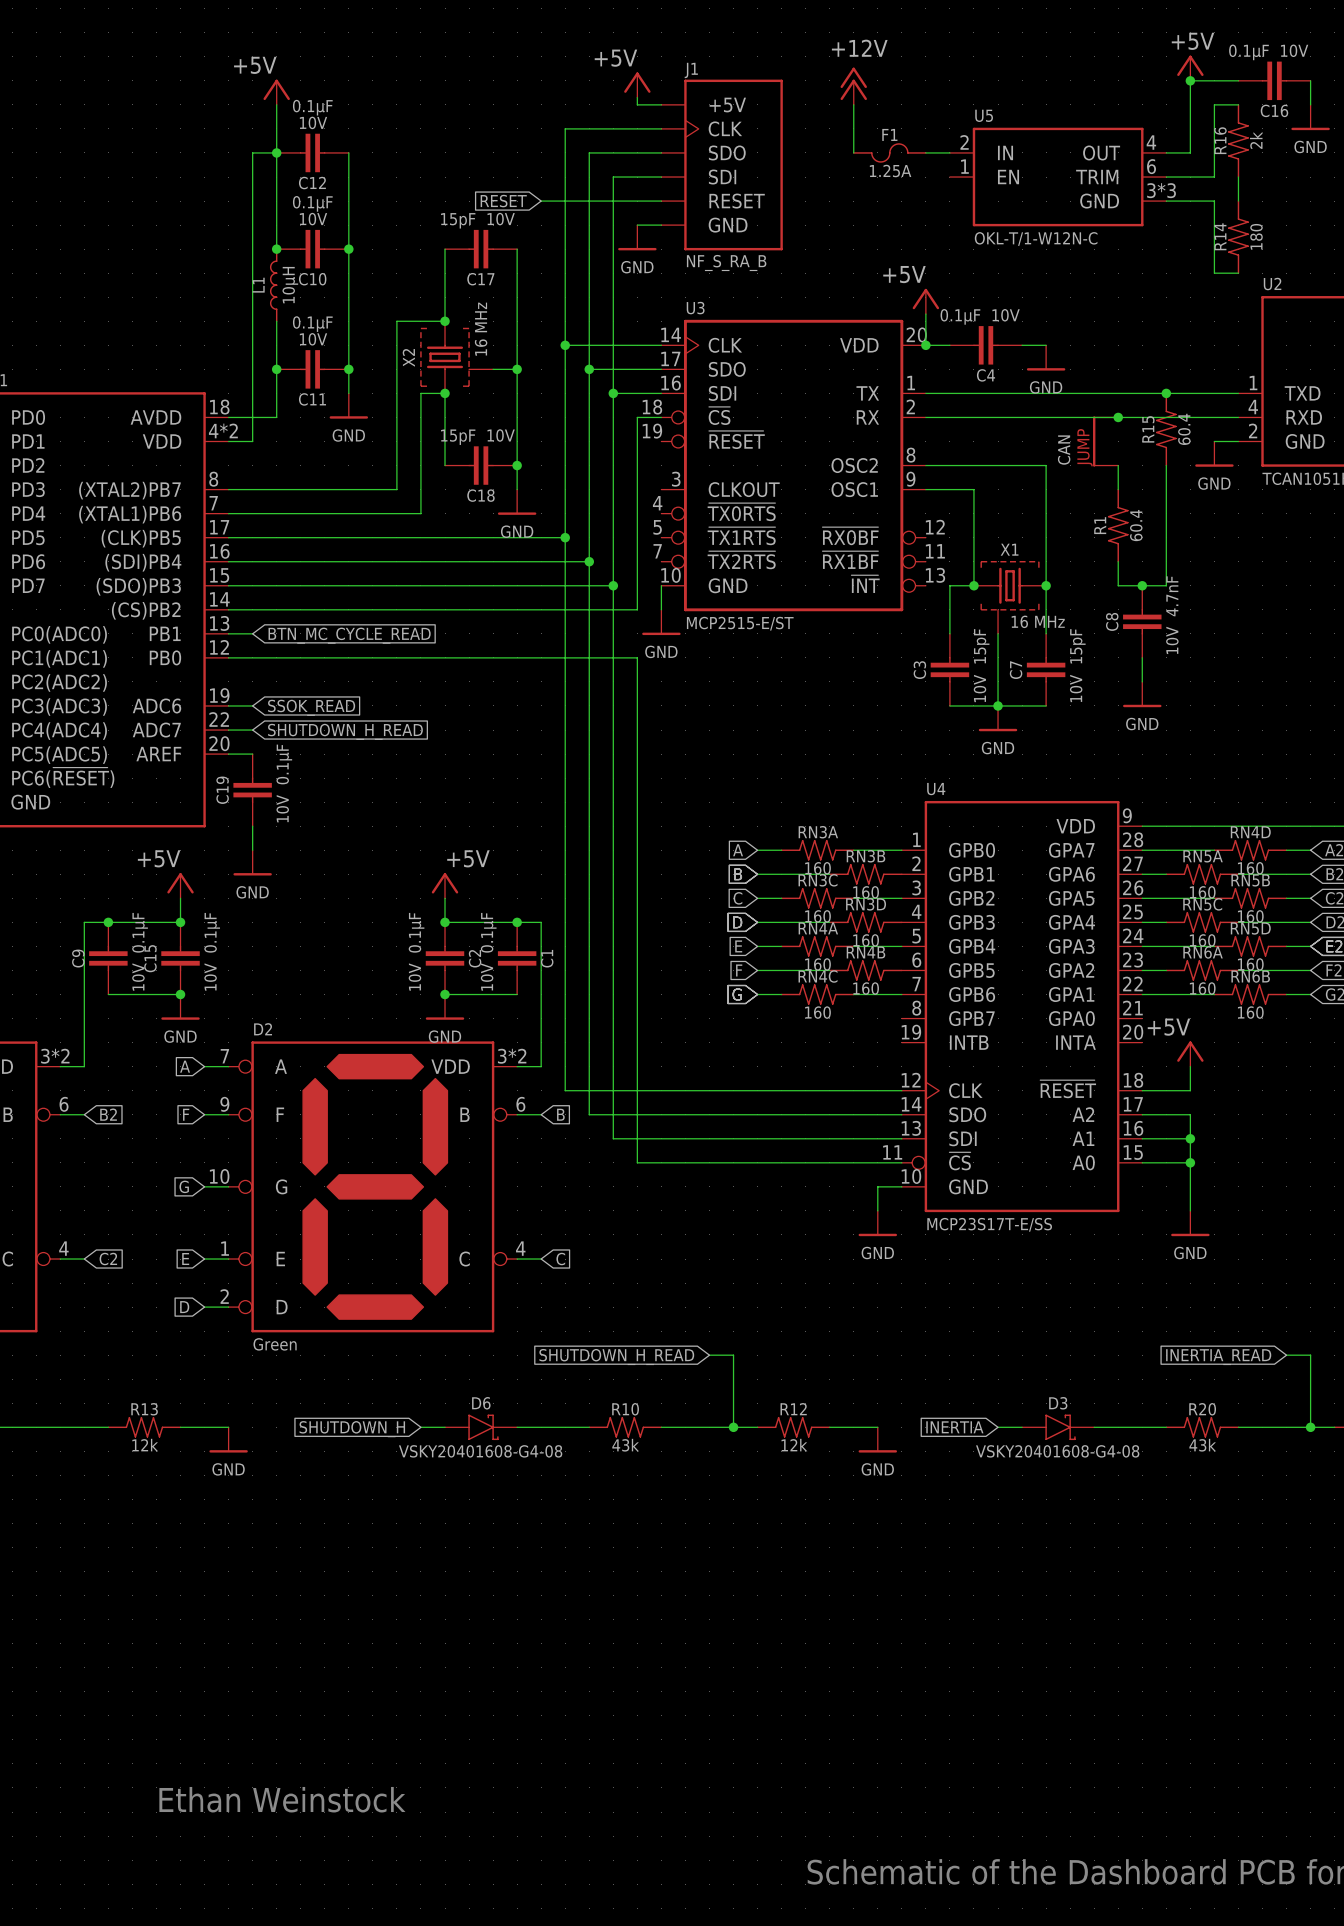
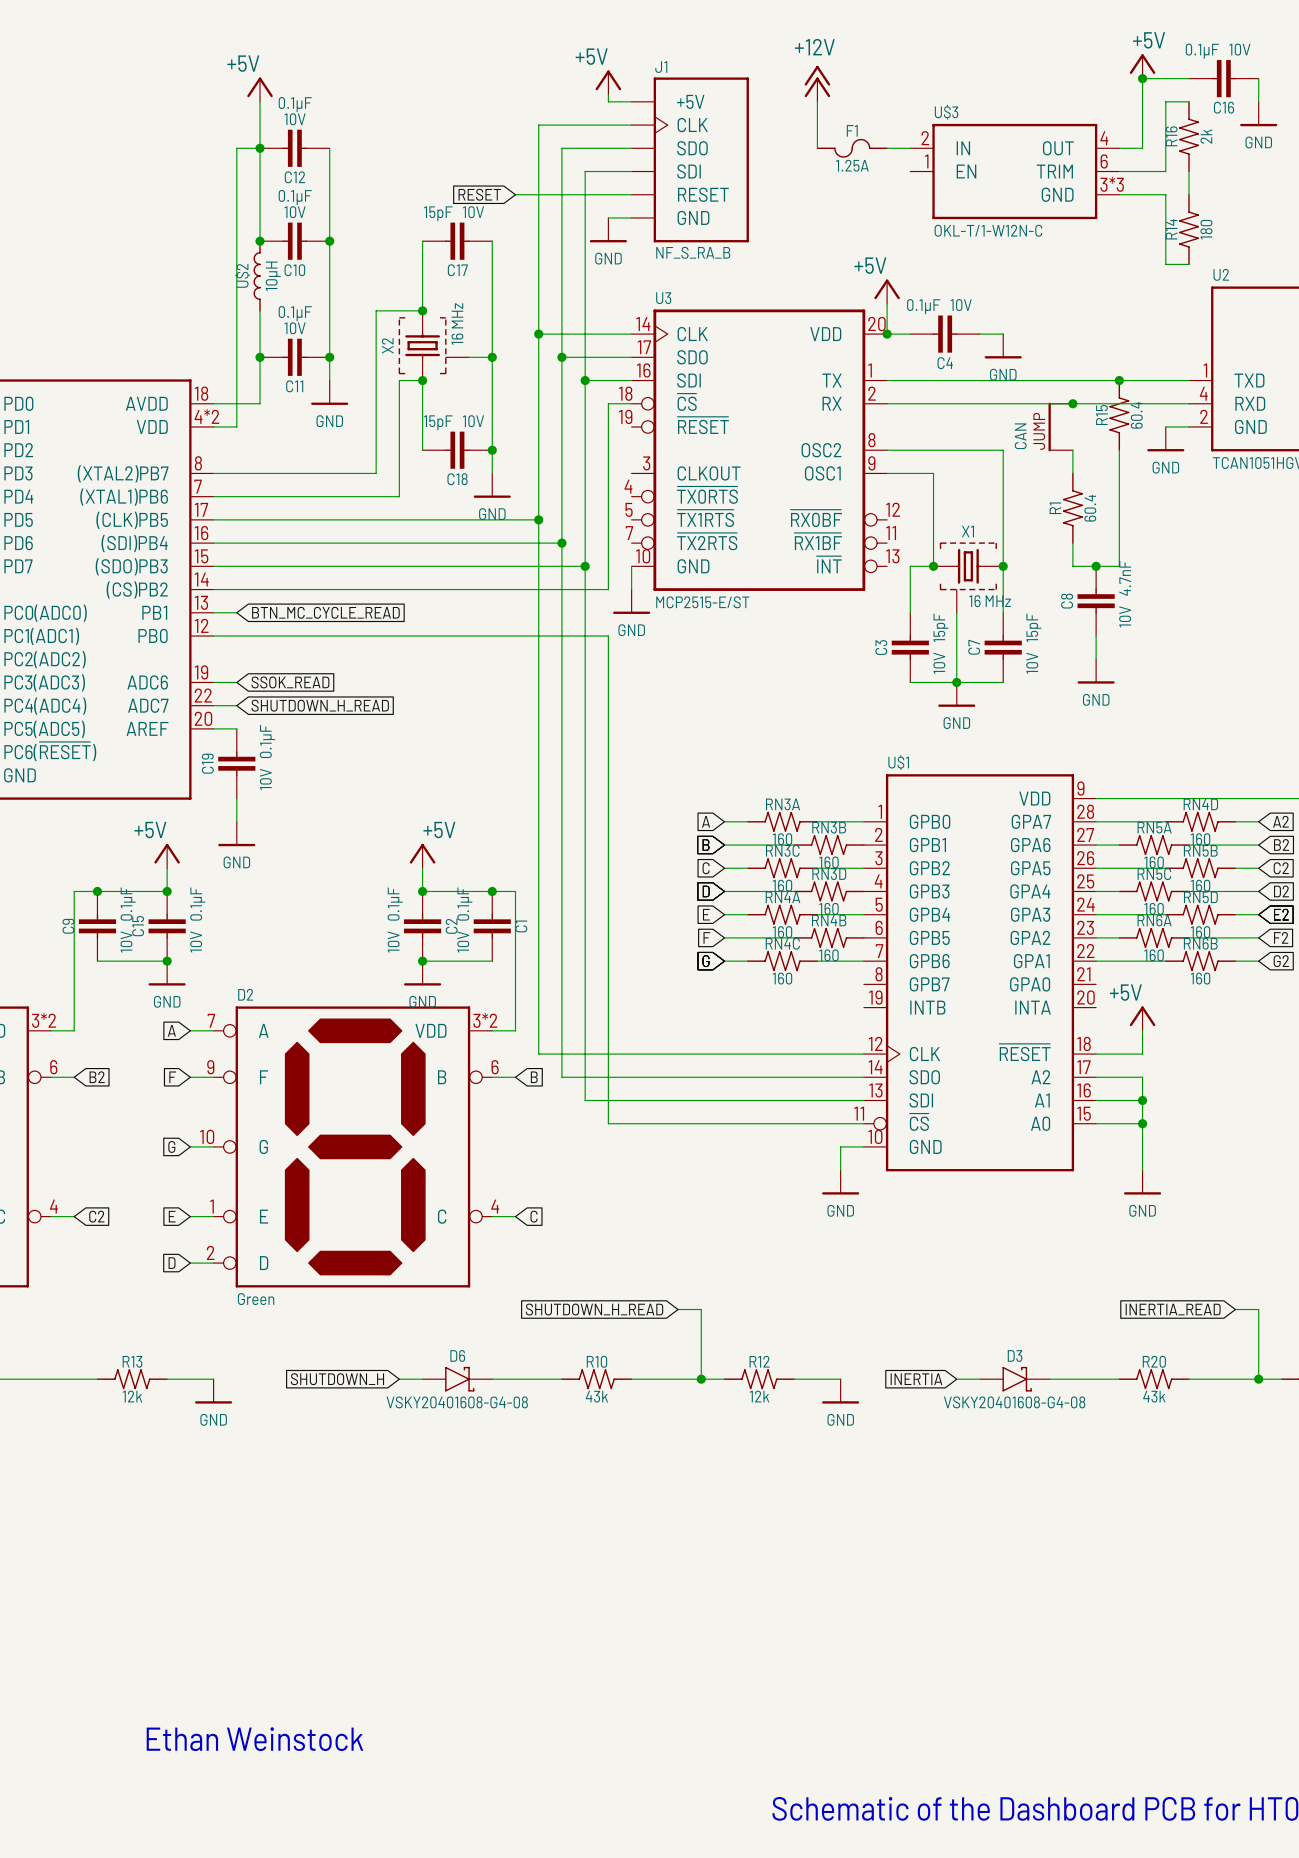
U5 name: U5 (984, 115) -> U$3 (946, 112)
L1 name: L1 (258, 285) -> U$2 (242, 275)
U4 name: U4 (936, 789) -> U$1 (898, 762)
U4 text: MCP23S17T-E/SS (989, 1224) -> none

